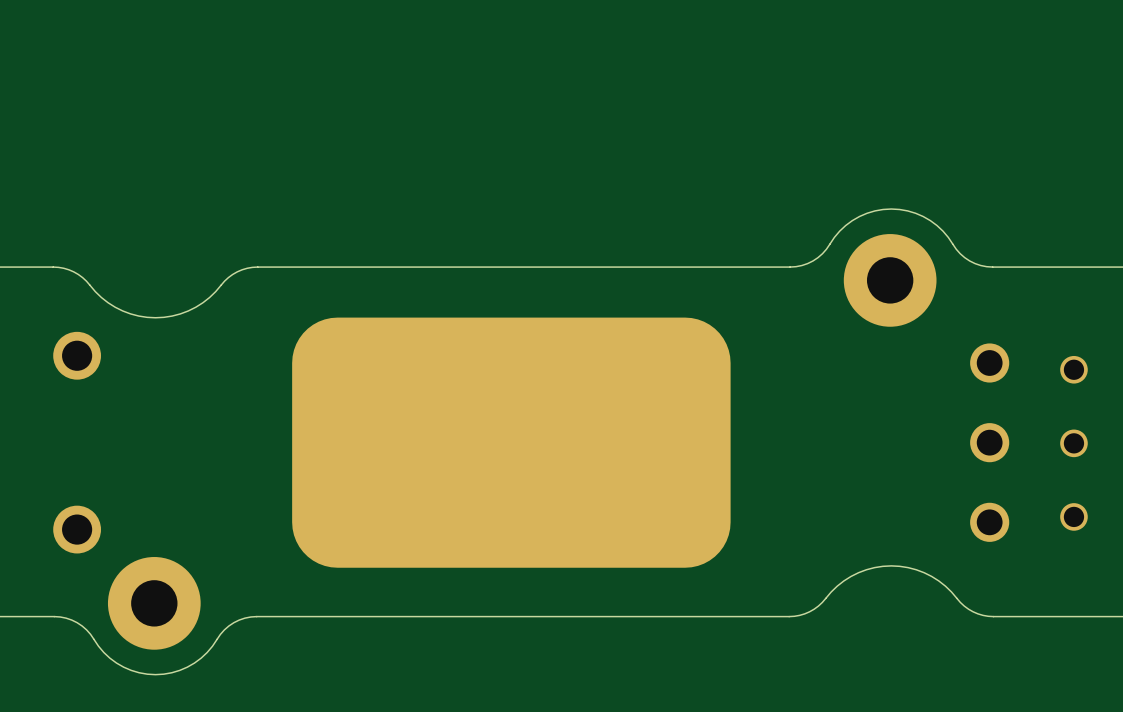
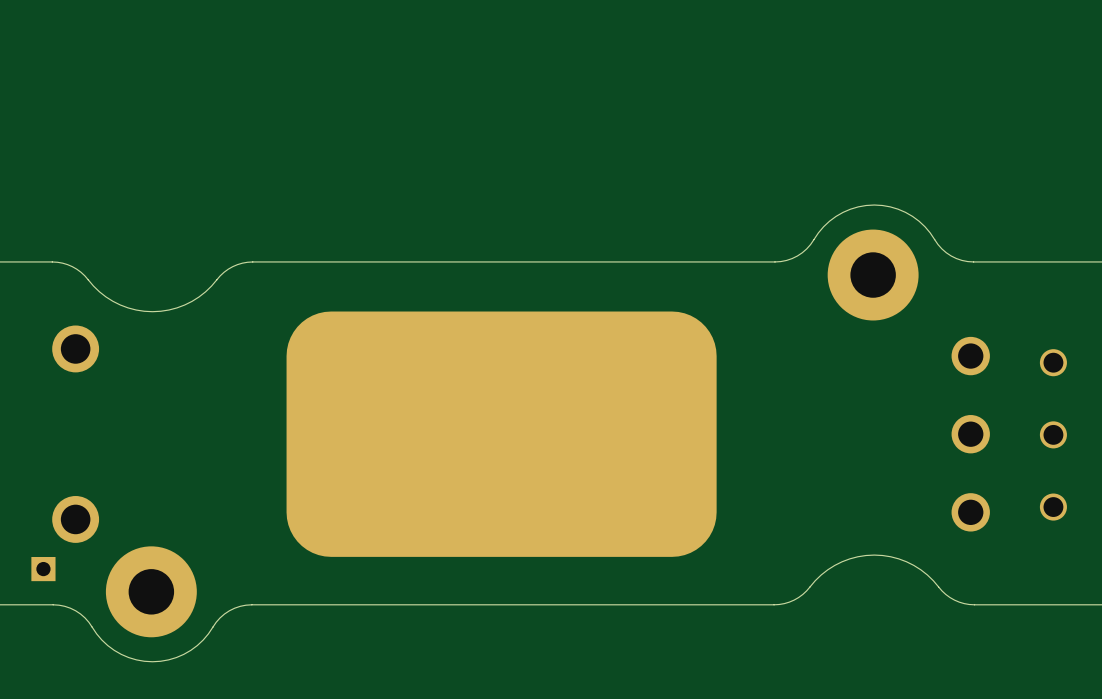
part: none -> (43, 569)

